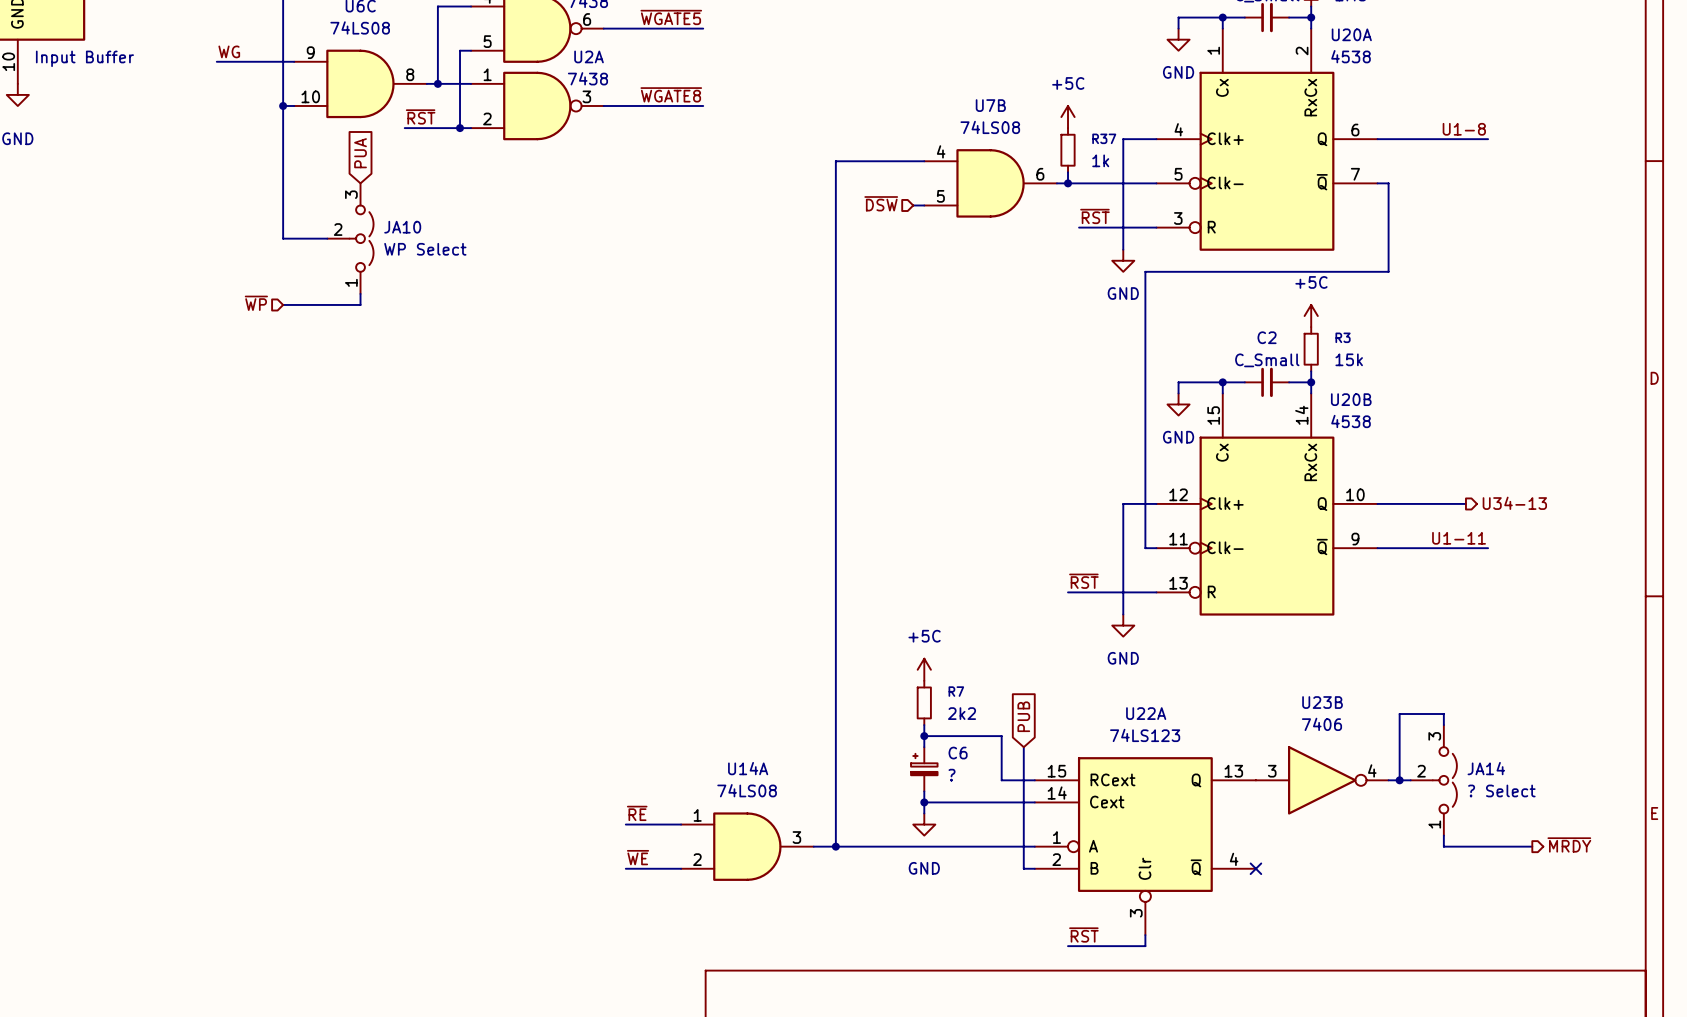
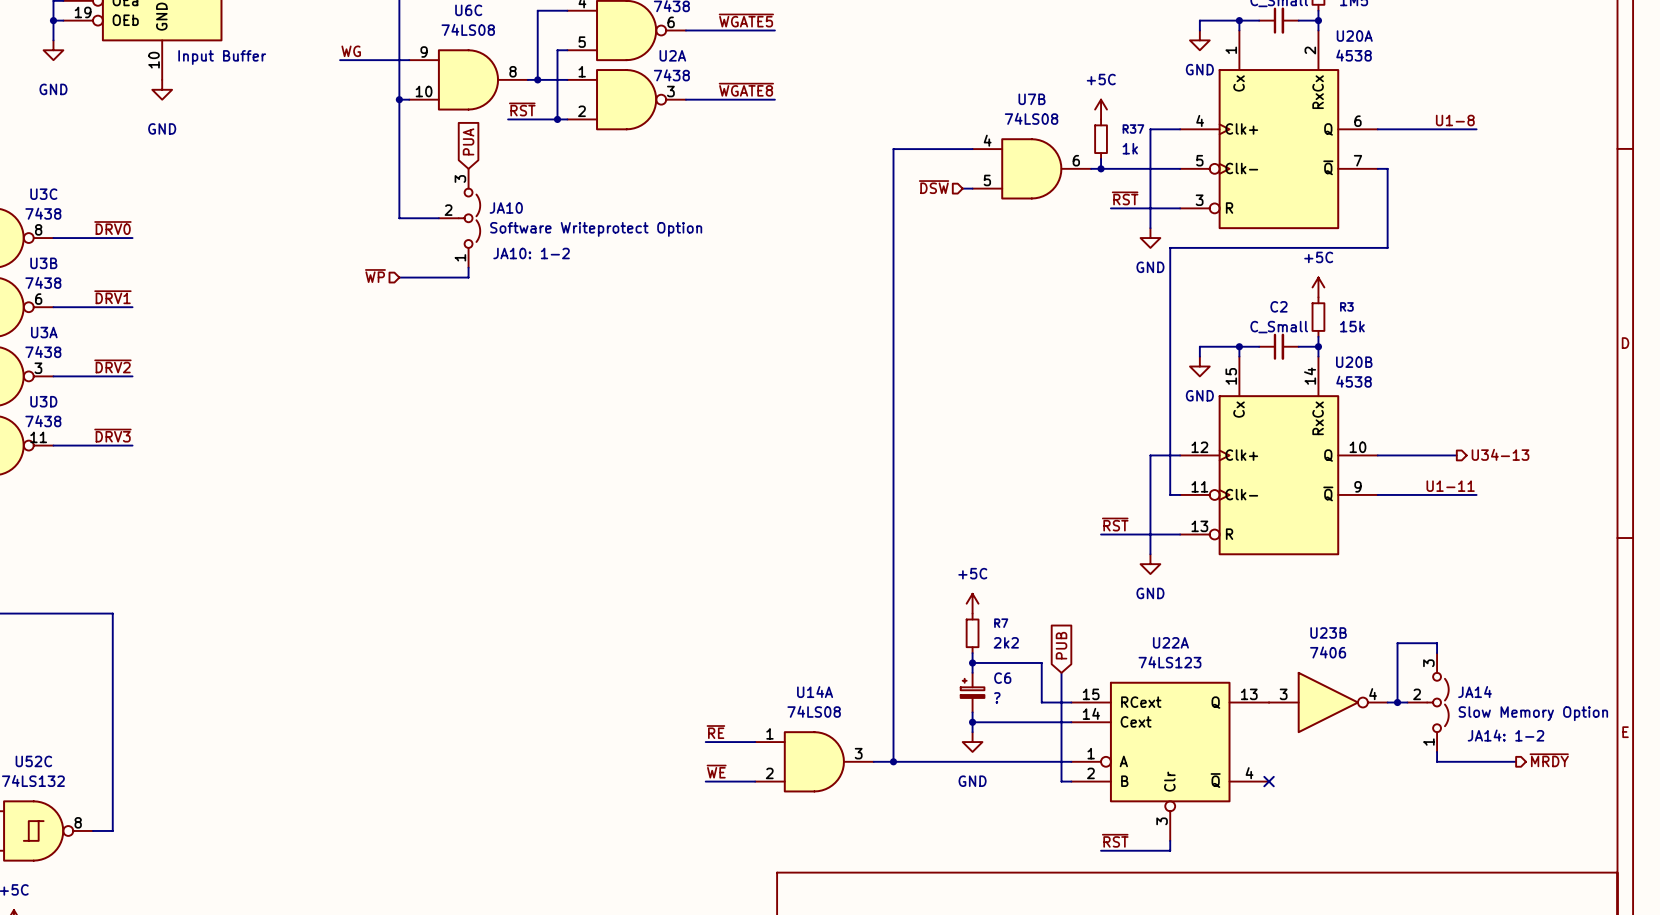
JA10 value: WP Select (425, 249) -> Software Writeprotect Option (596, 229)
text: none -> JA10: 1-2 (531, 253)
JA14 value: ? Select (1501, 790) -> Slow Memory Option (1533, 713)
text: none -> JA14: 1-2 (1505, 735)

